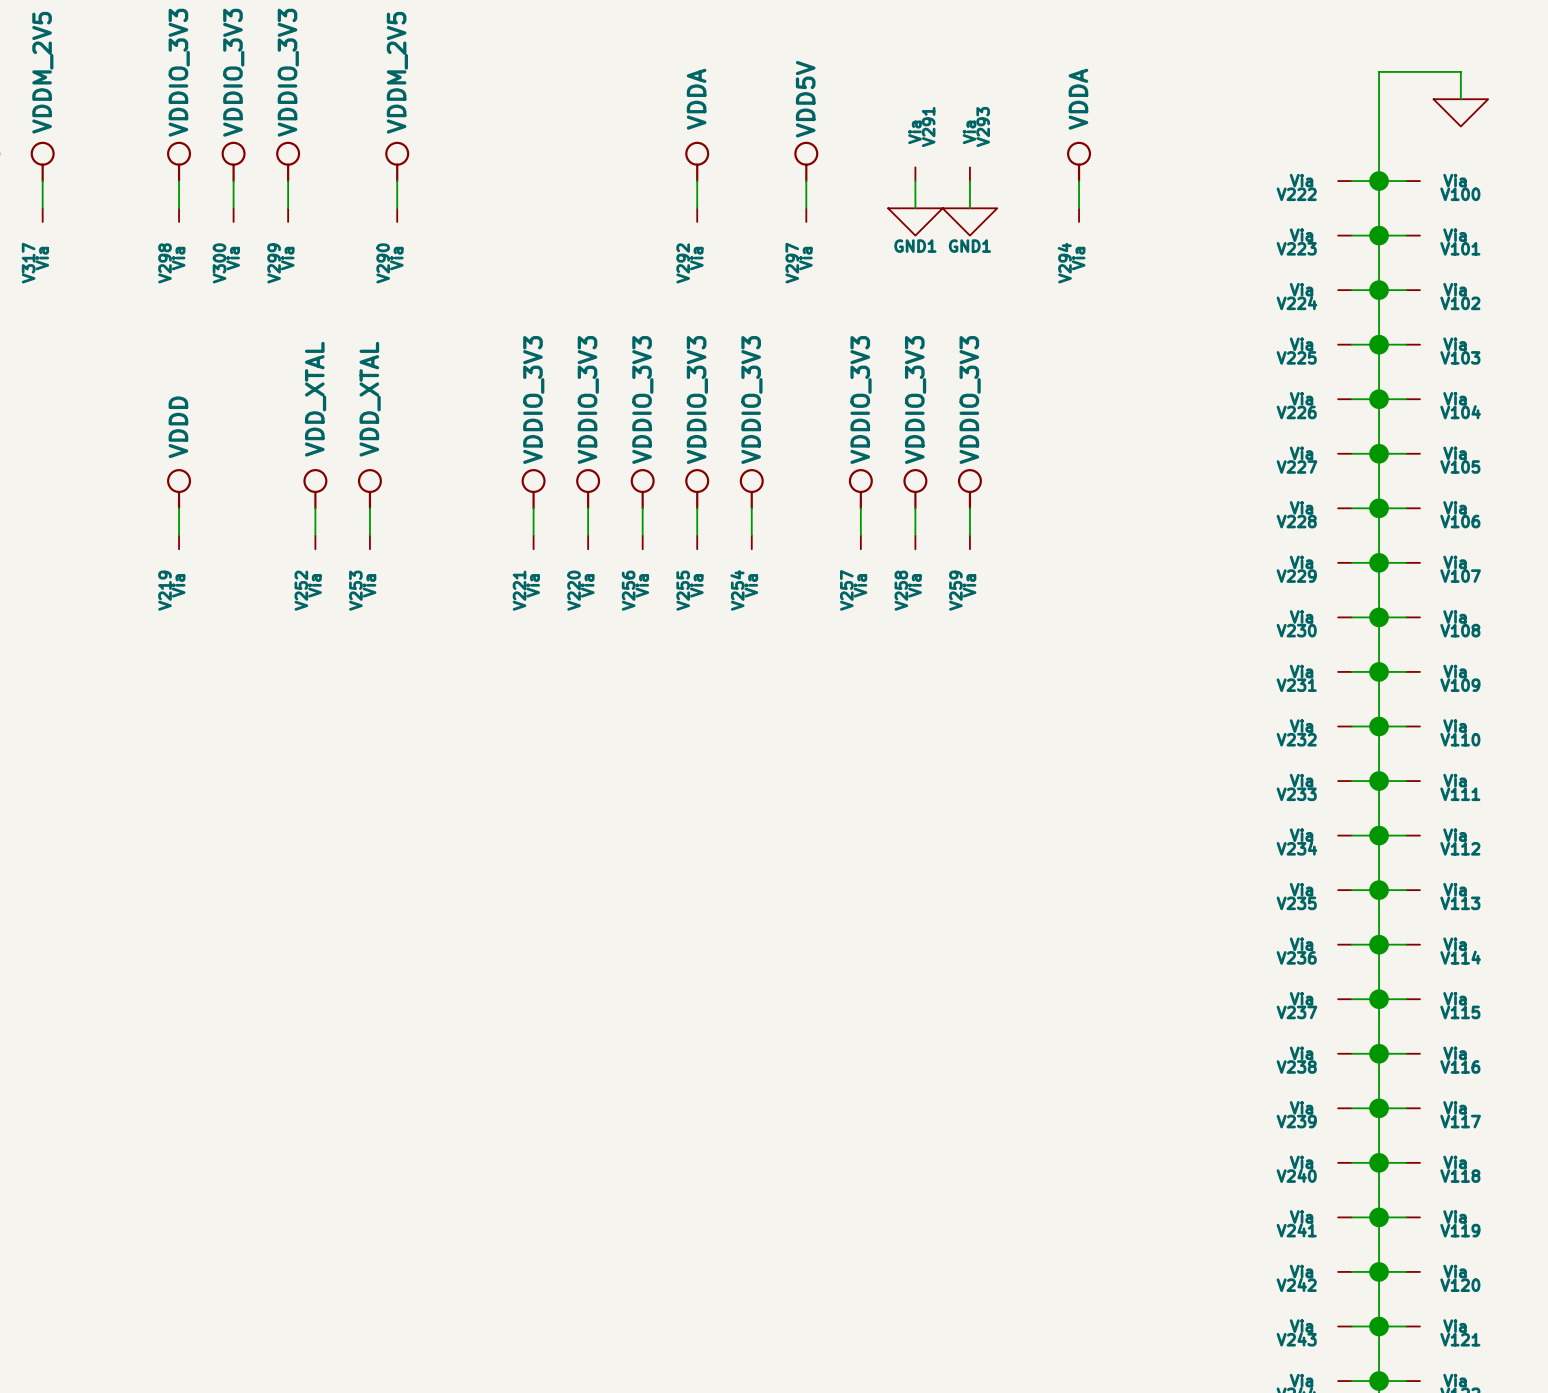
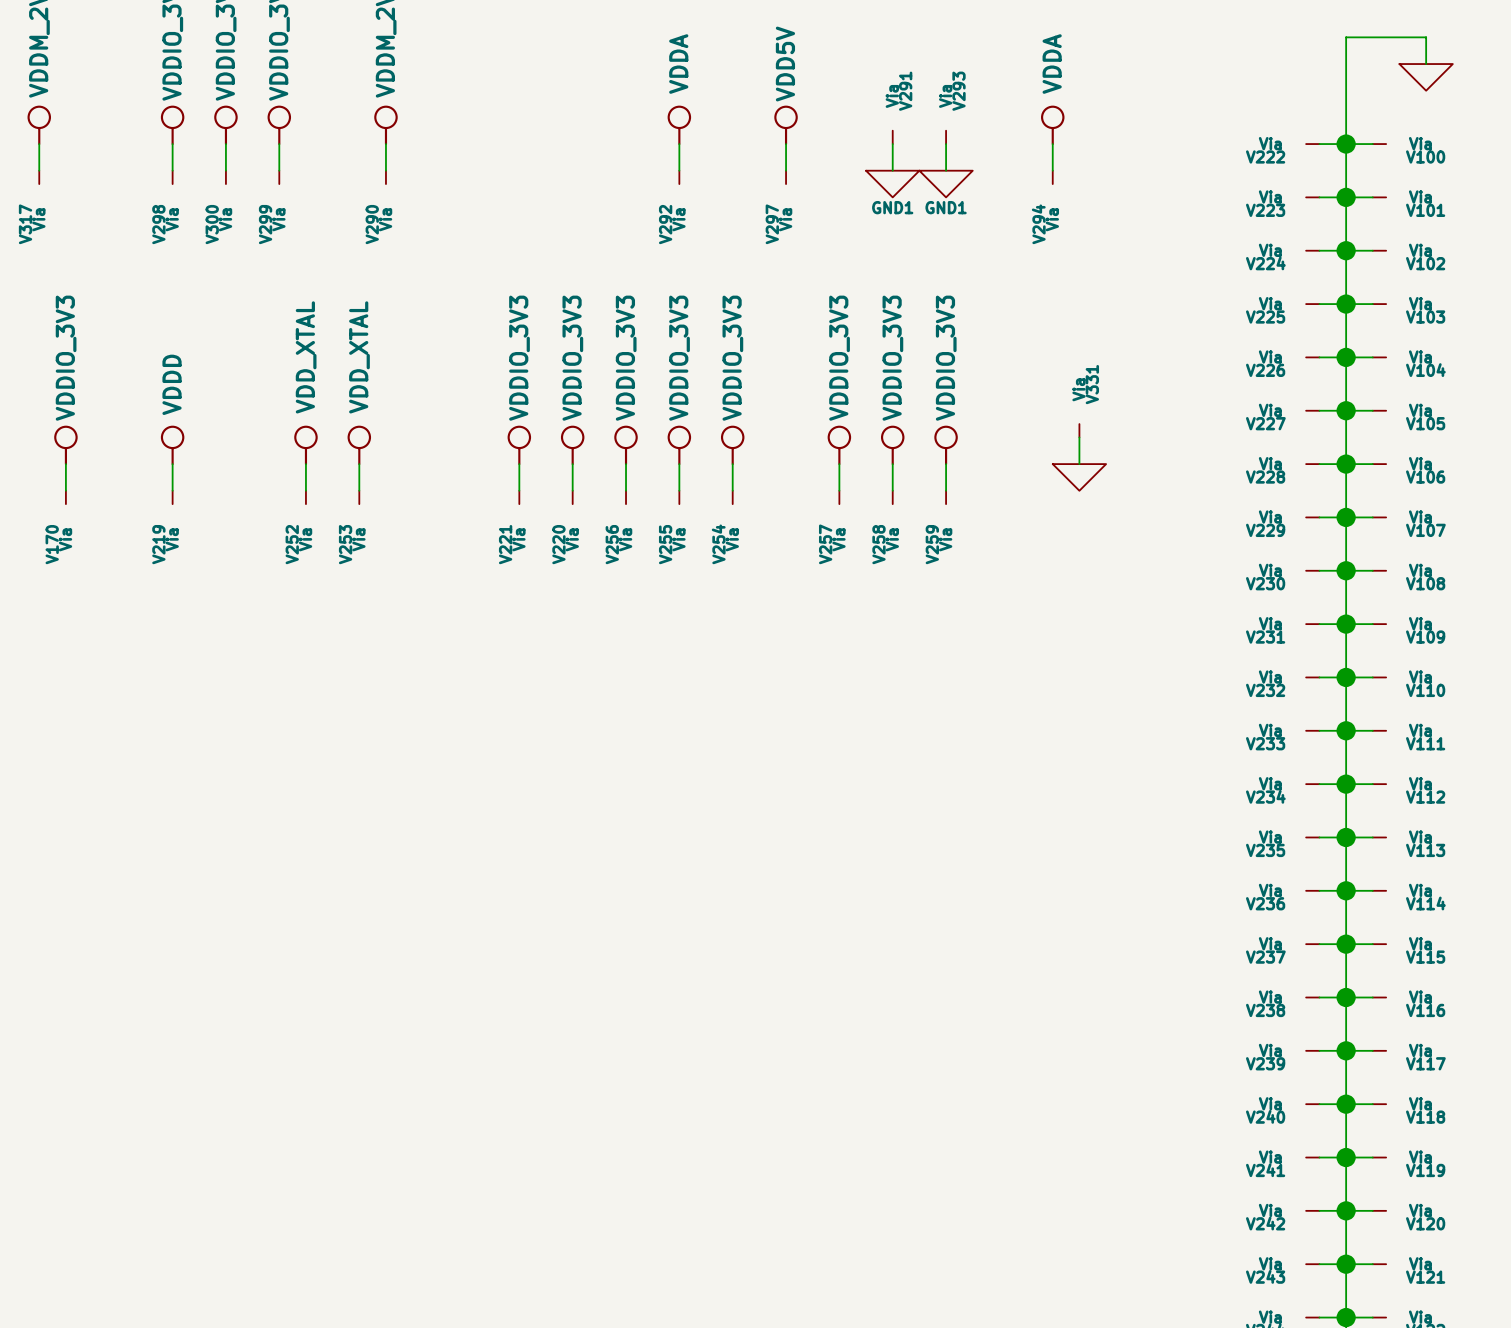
V331: none -> (1079, 430)
wire: none -> (1079, 437) (1079, 464)
power symbol: none -> VDDIO_3V3 (65, 445)
wire: none -> (65, 464) (65, 490)
power symbol: none -> (1079, 477)
V170: none -> (65, 497)

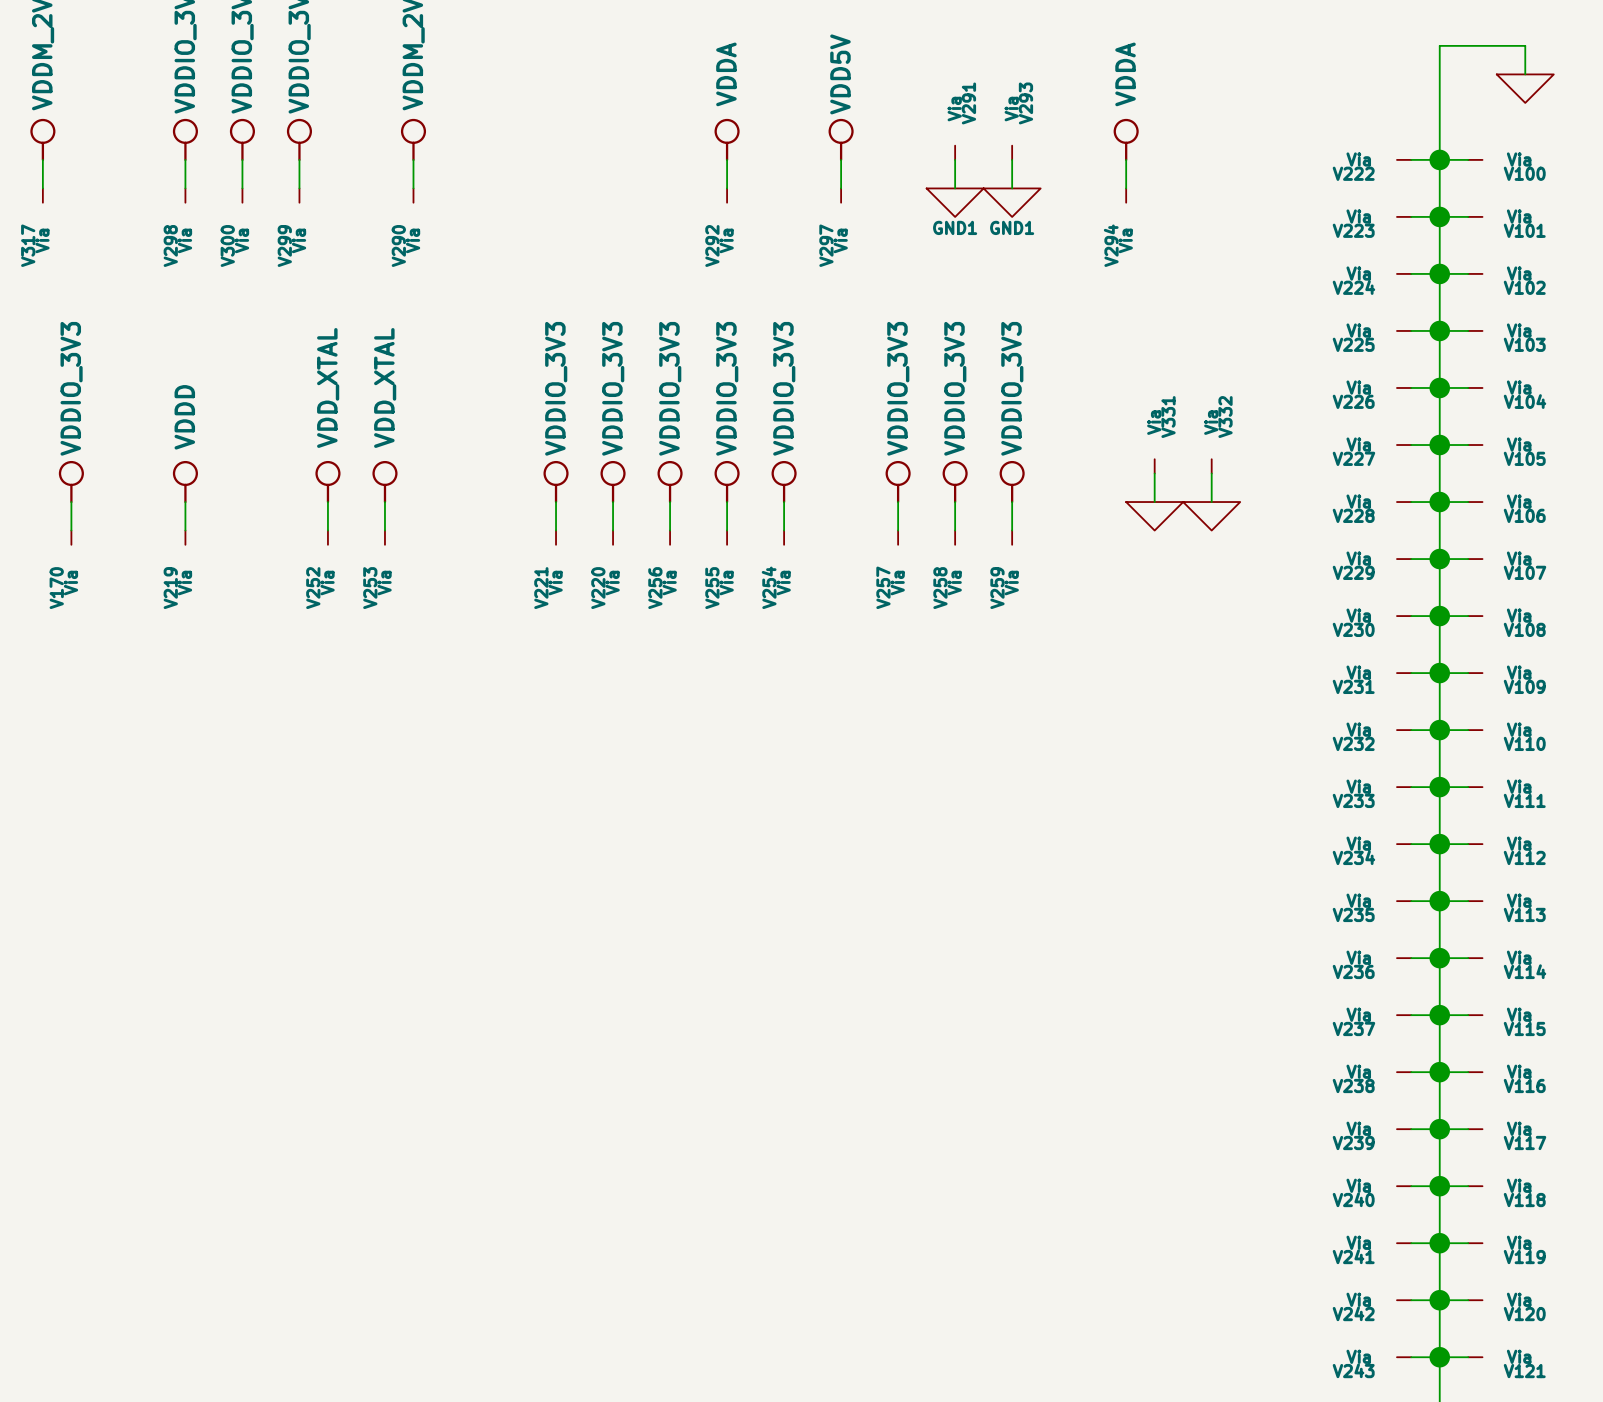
V332: none -> (1211, 466)
wire: none -> (1211, 473) (1211, 502)
power symbol: none -> (1211, 516)

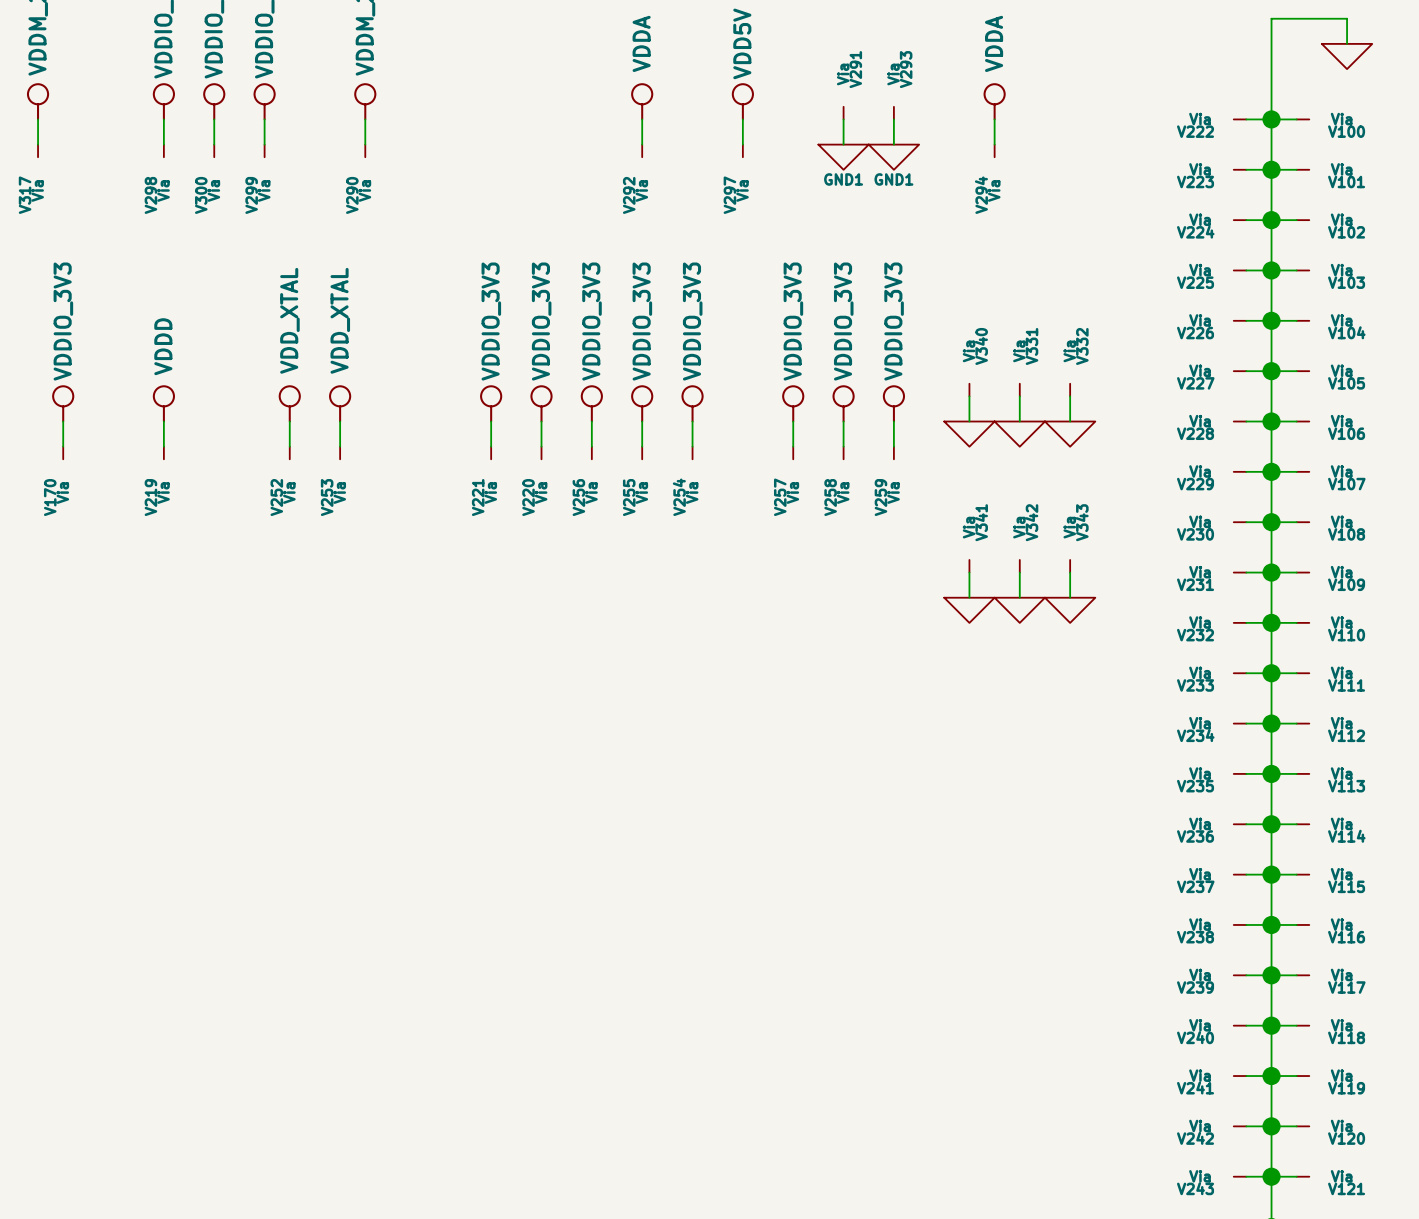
V340: none -> (969, 390)
wire: none -> (969, 396) (969, 421)
power symbol: none -> (969, 434)
V341: none -> (969, 566)
V342: none -> (1019, 566)
V343: none -> (1070, 566)
wire: none -> (969, 572) (969, 597)
wire: none -> (1019, 572) (1019, 597)
wire: none -> (1070, 572) (1070, 597)
power symbol: none -> (969, 610)
power symbol: none -> (1019, 610)
power symbol: none -> (1070, 610)

